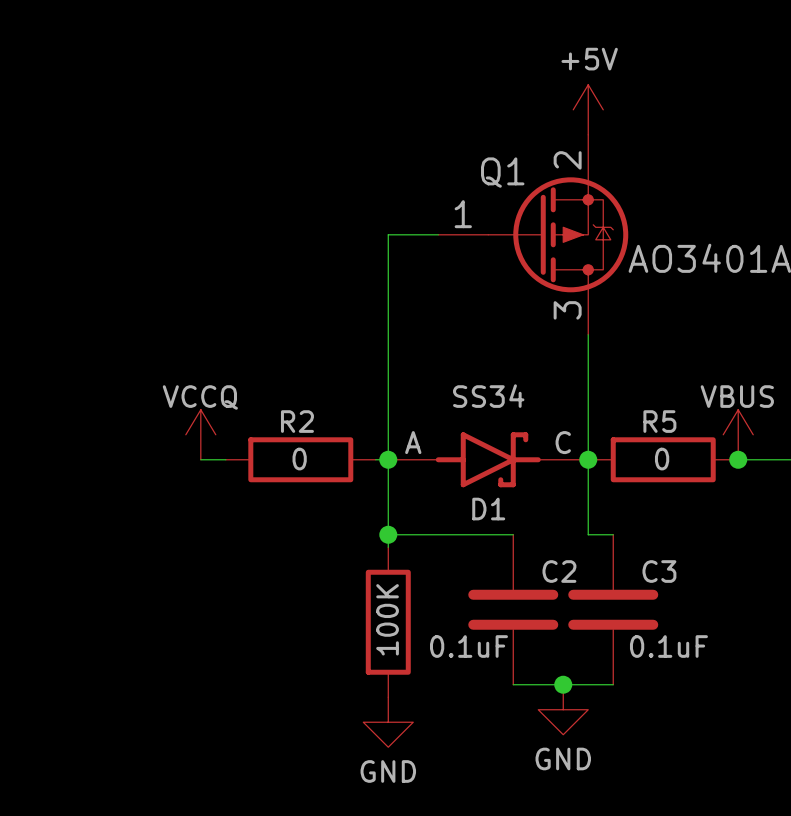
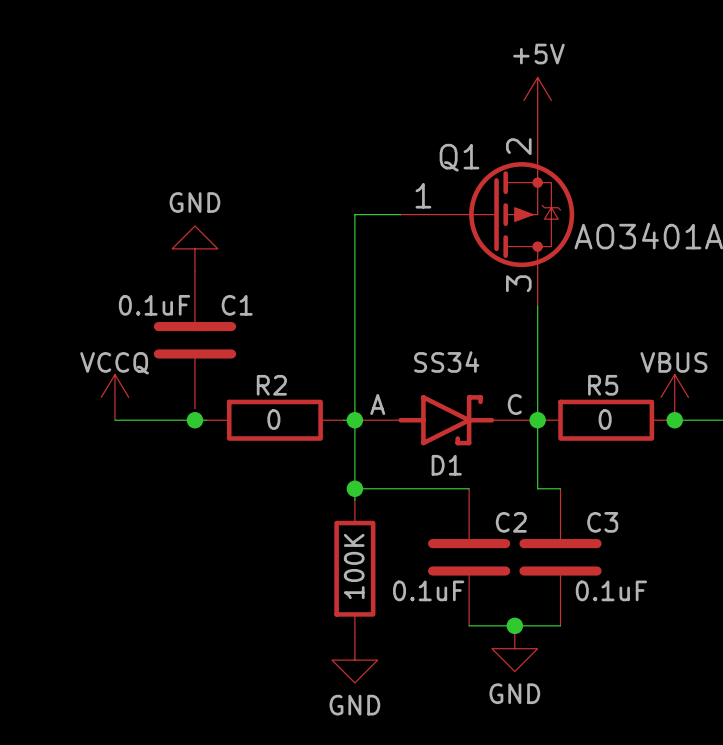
power symbol: none -> GND (194, 248)
C1: none -> 0.1uF (194, 340)
power symbol position: VCCQ (200, 434) -> VCCQ (115, 397)
wire: none -> (115, 420) (183, 420)
junction: none -> (194, 420)

